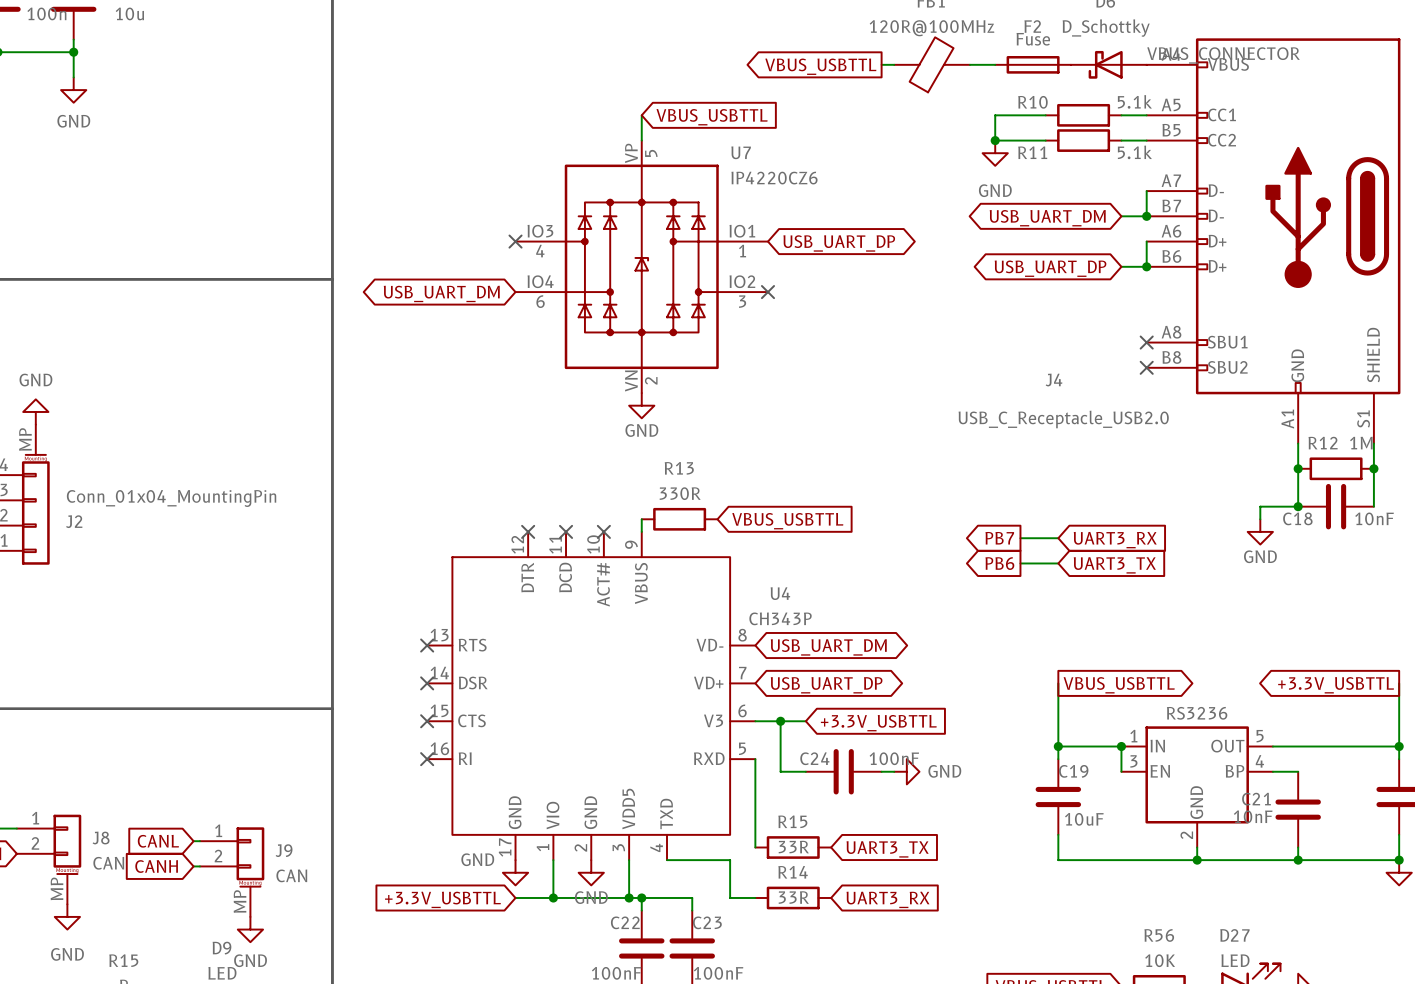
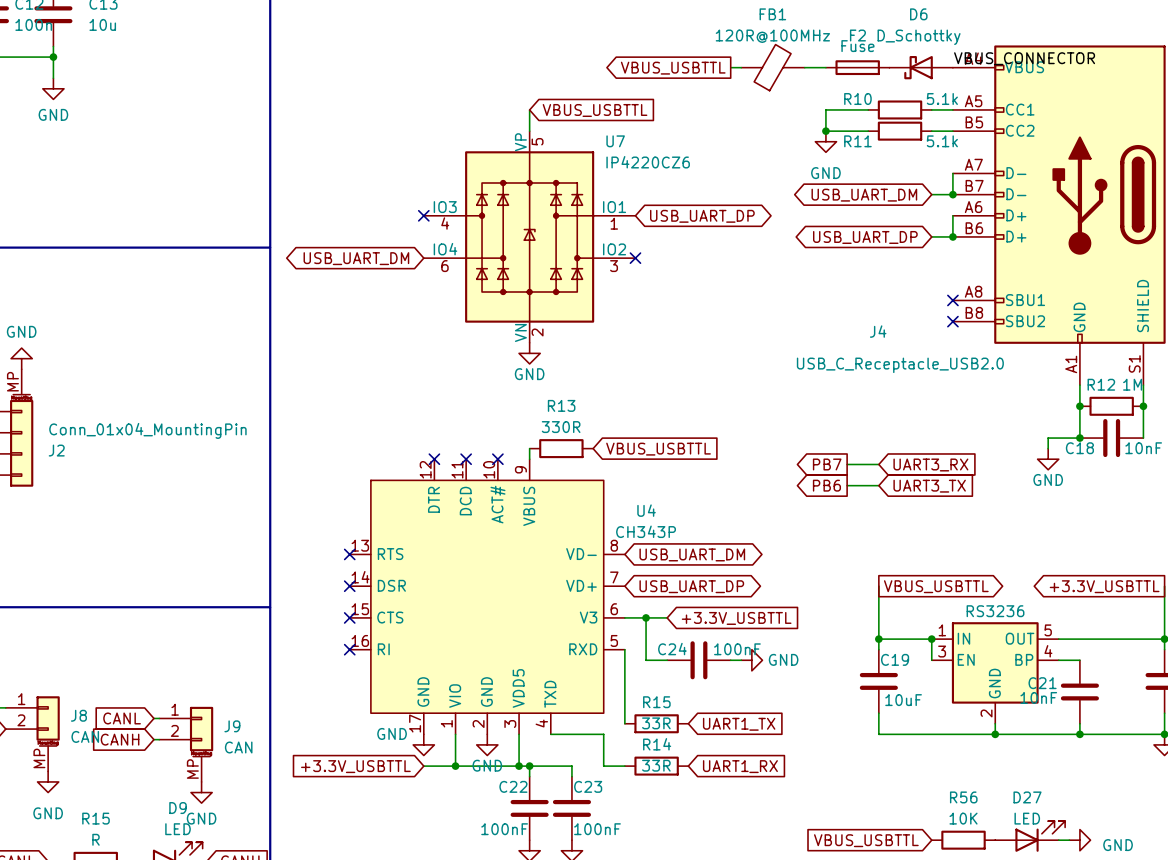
global label: UART3_TX (887, 849) -> UART1_TX (739, 724)
global label: UART3_RX (888, 899) -> UART1_RX (740, 766)

